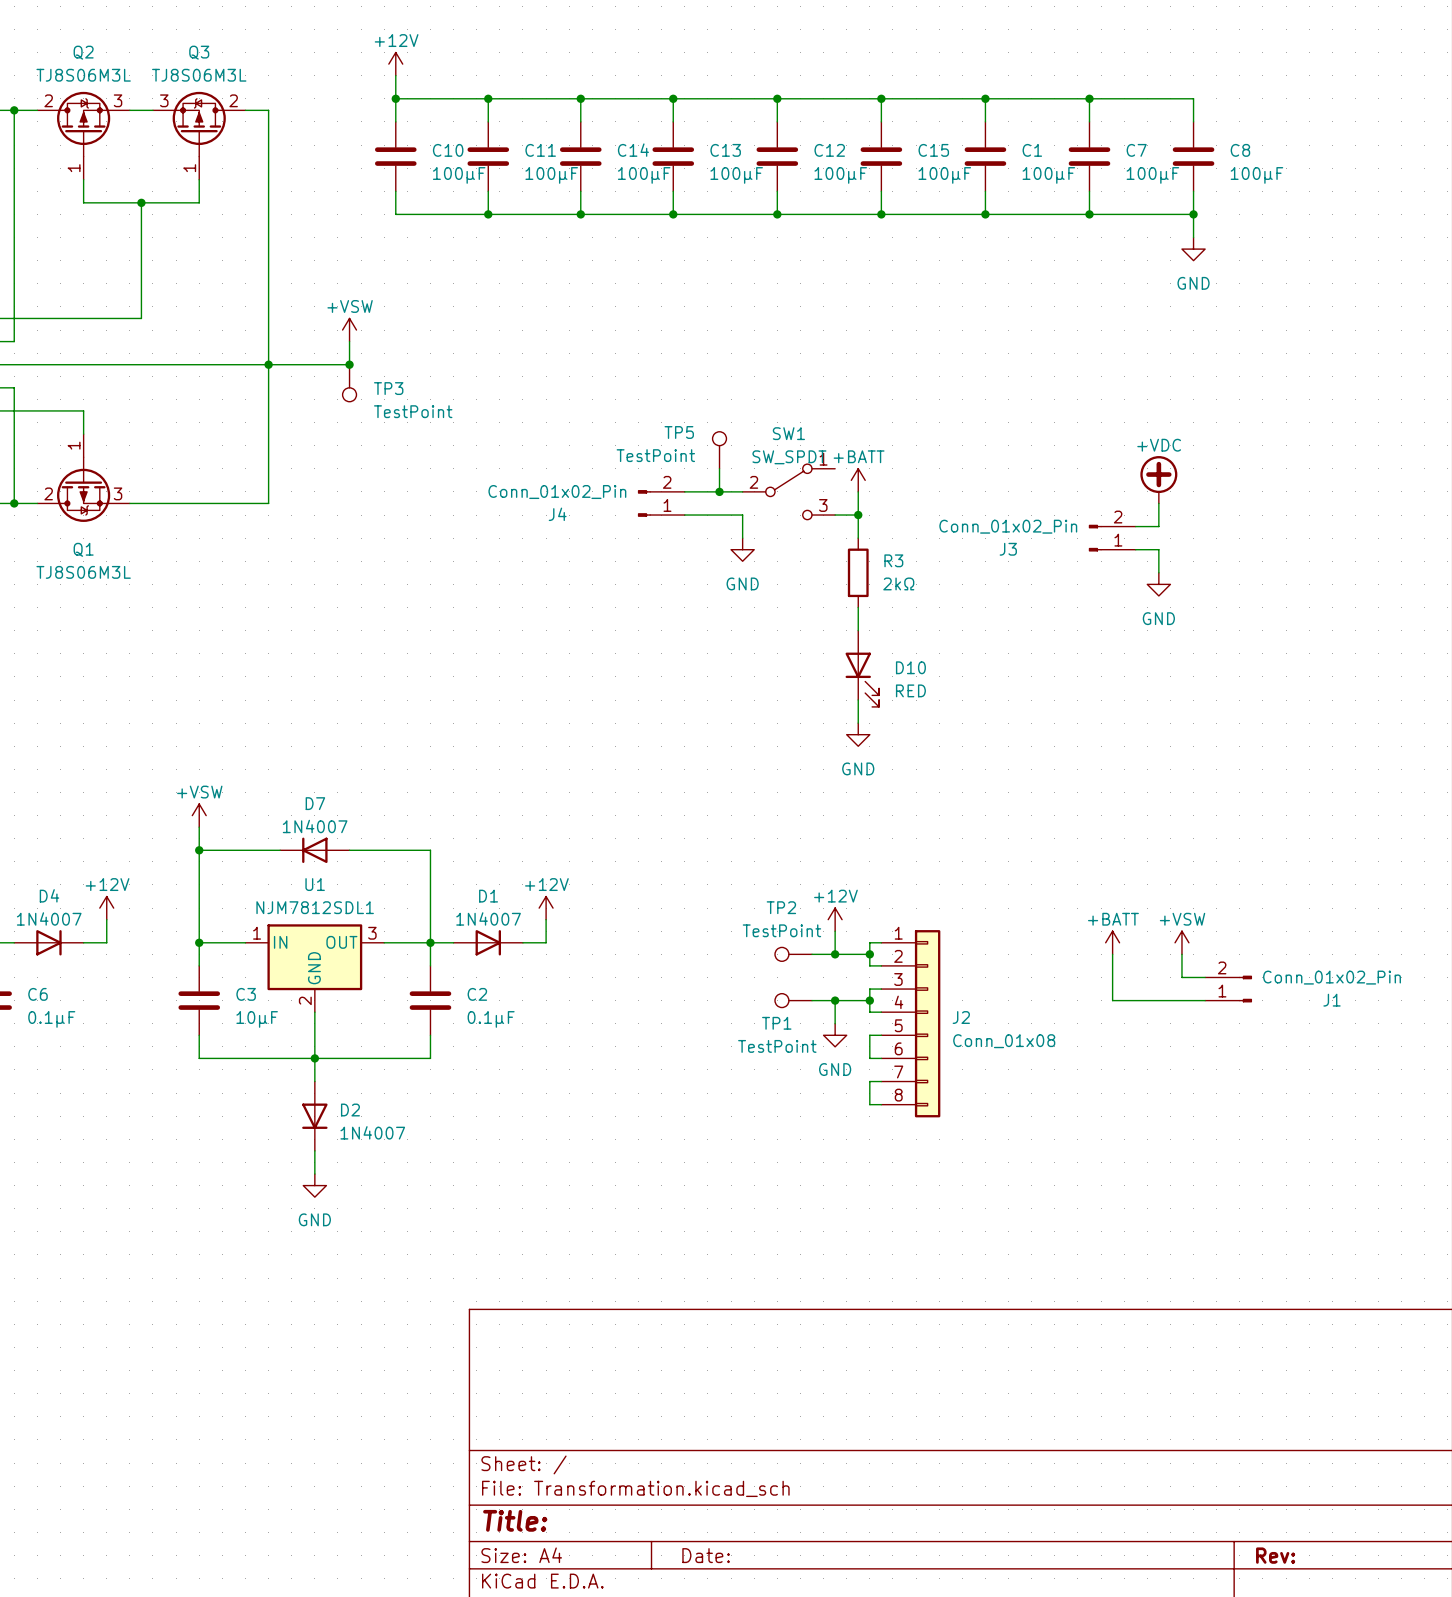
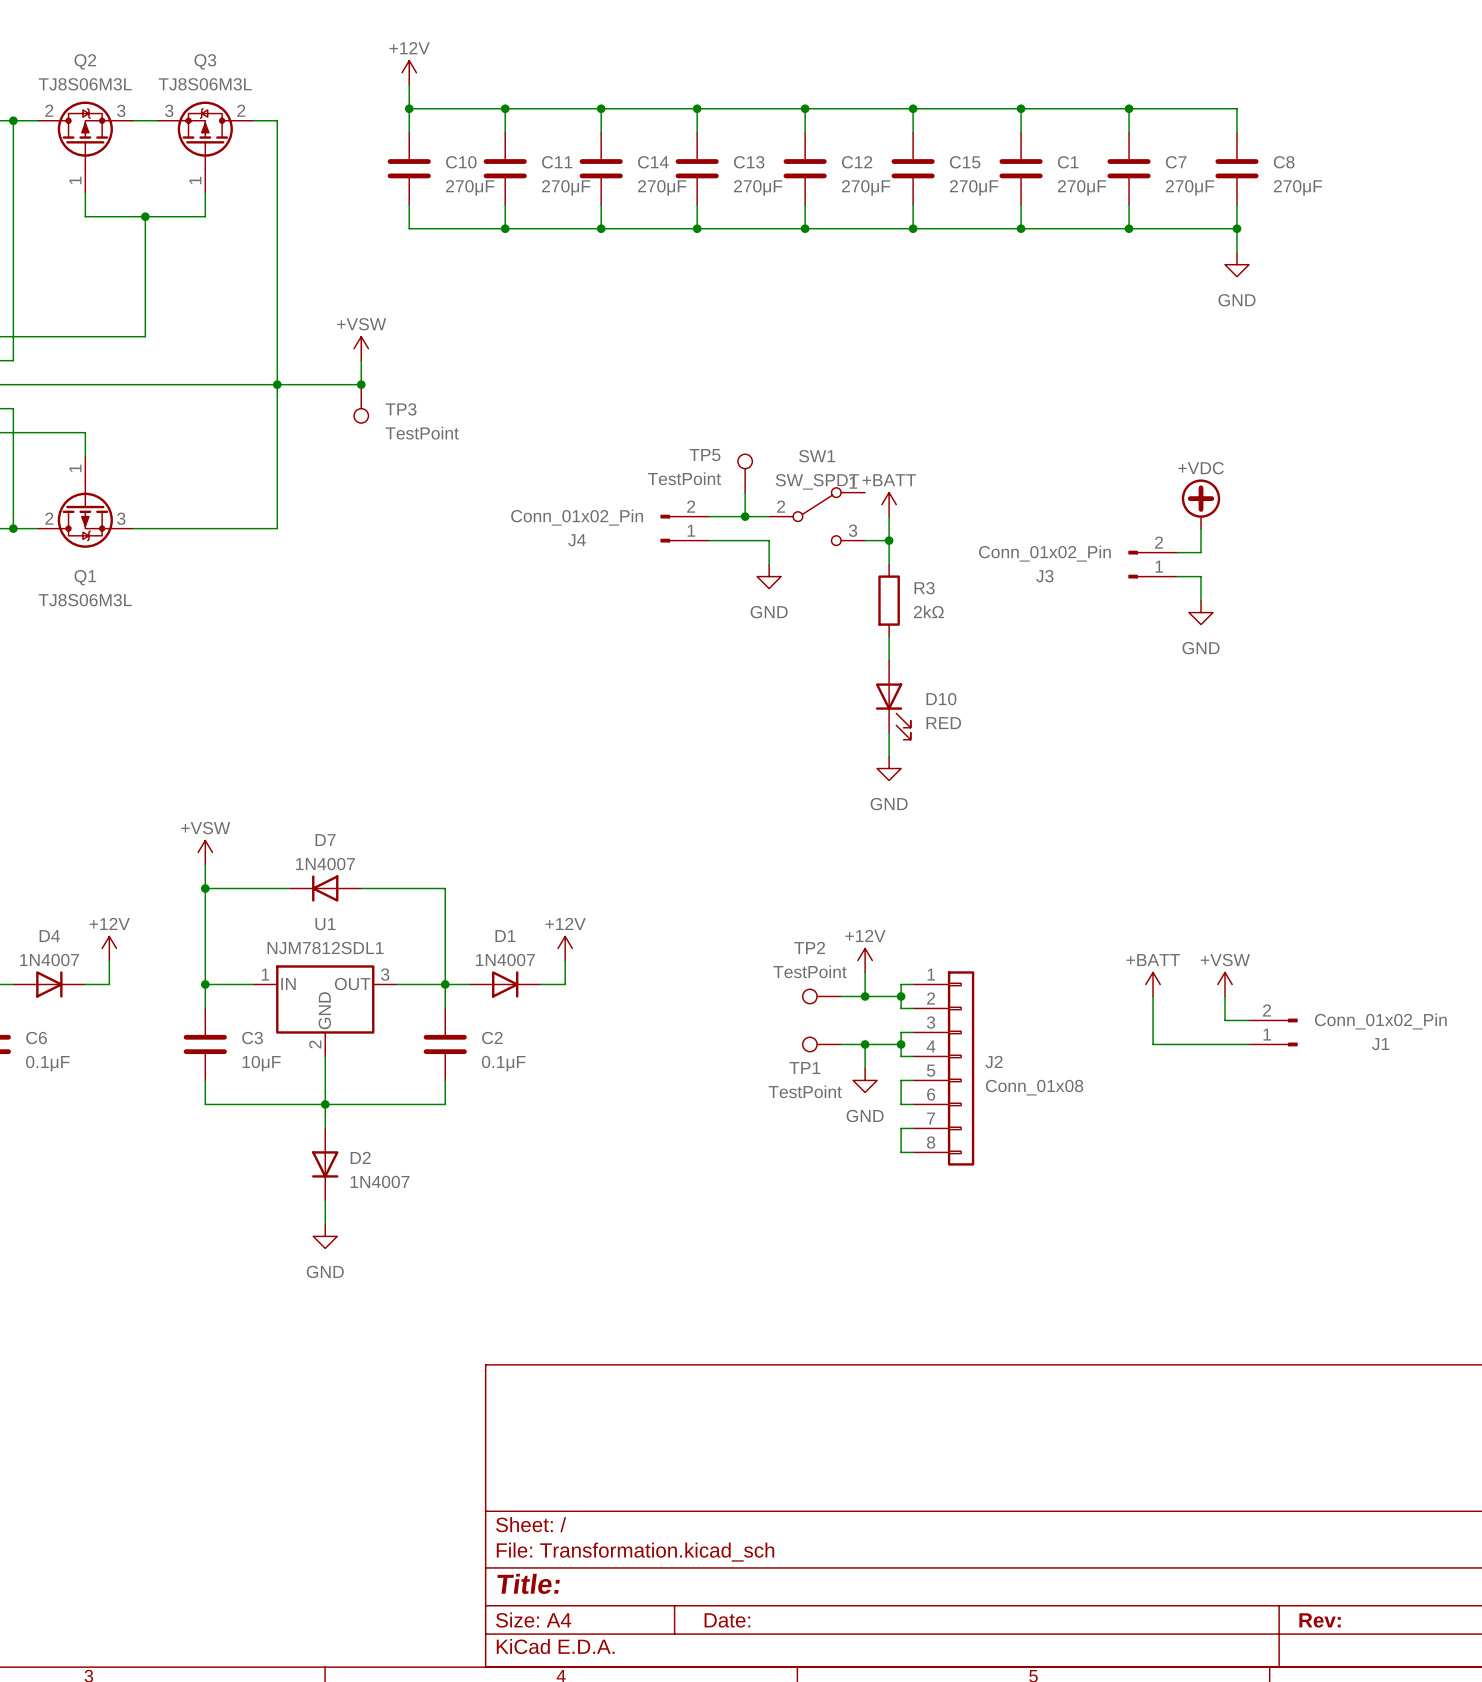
C10 value: 100μF (459, 175) -> 270μF (470, 187)
C11 value: 100μF (551, 175) -> 270μF (566, 187)
C14 value: 100μF (644, 175) -> 270μF (662, 187)
C13 value: 100μF (736, 175) -> 270μF (758, 187)
C12 value: 100μF (840, 175) -> 270μF (866, 187)
C15 value: 100μF (944, 175) -> 270μF (974, 187)
C1 value: 100μF (1048, 175) -> 270μF (1082, 187)
C7 value: 100μF (1152, 175) -> 270μF (1190, 187)
C8 value: 100μF (1256, 175) -> 270μF (1297, 187)

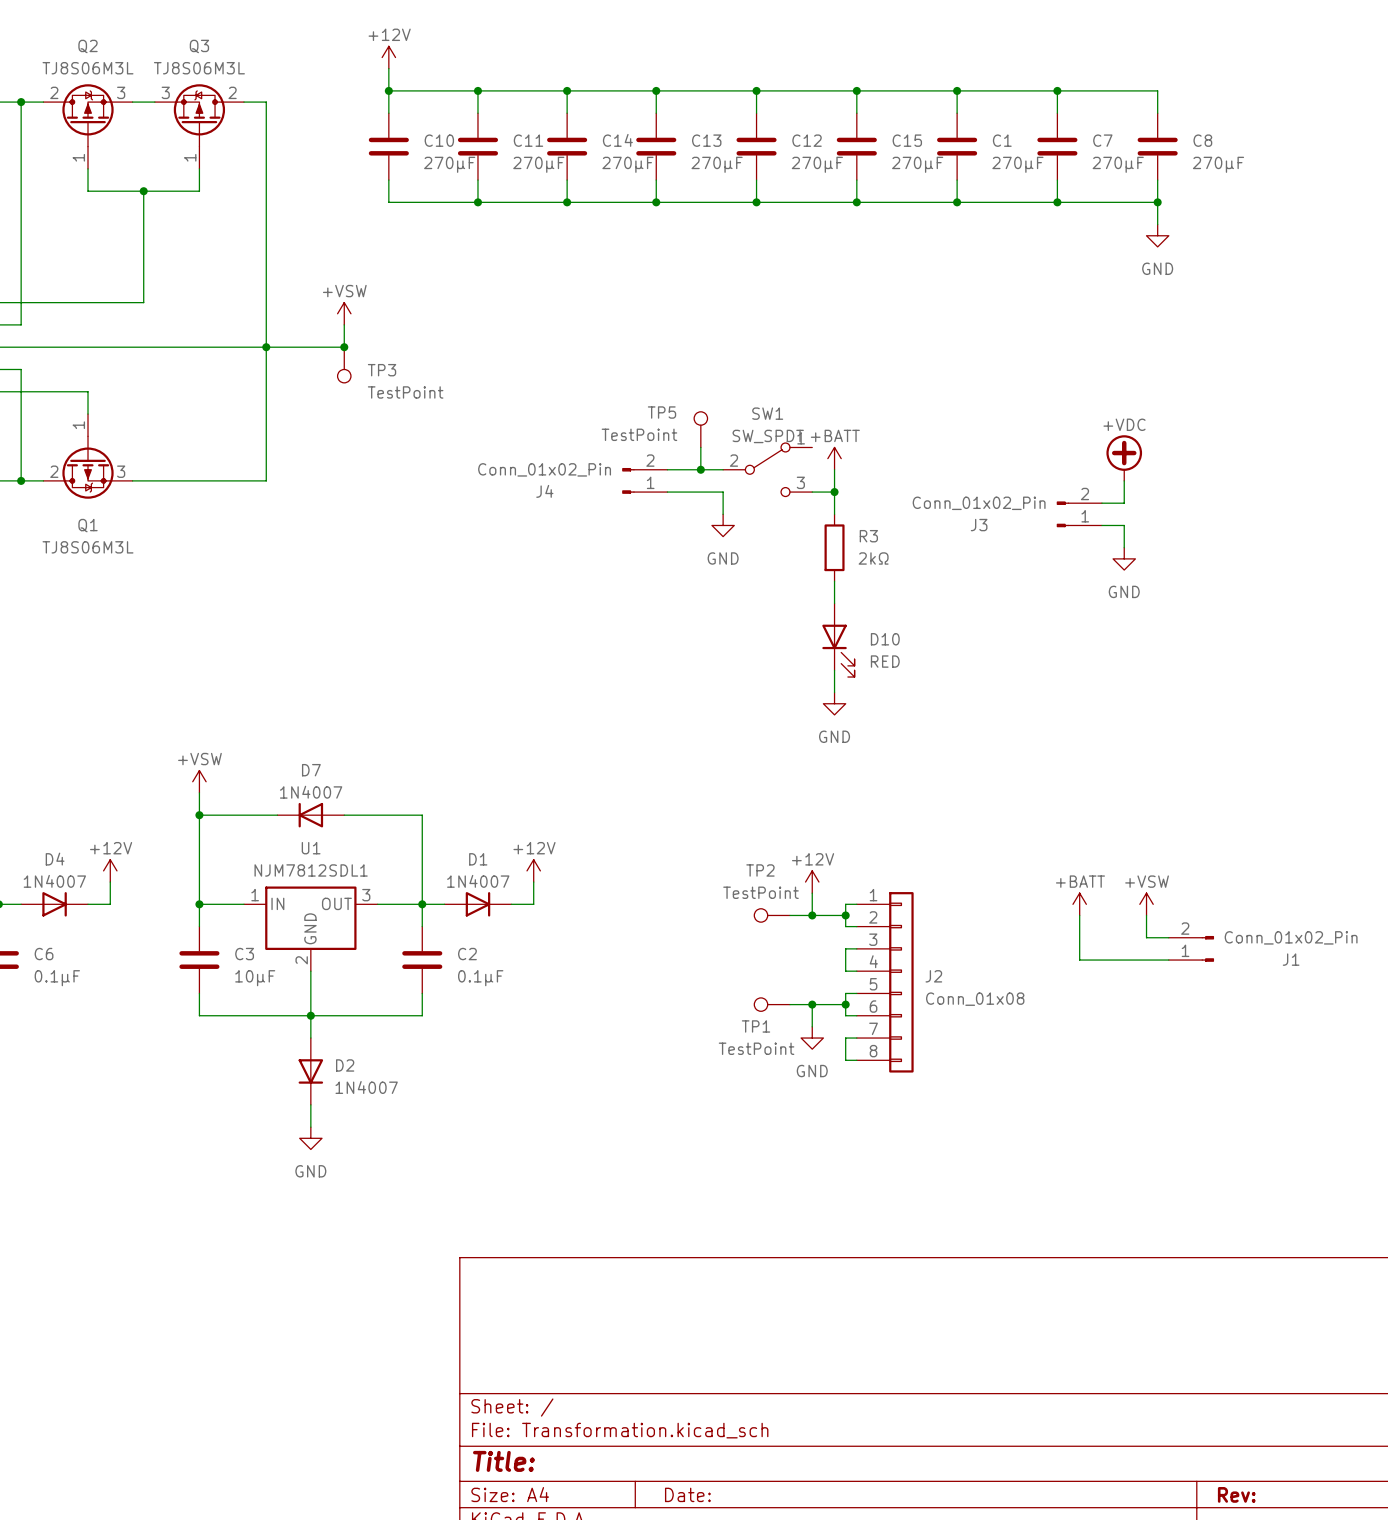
TP1 position: (821, 1044) -> (772, 1004)
wire: (841, 1044) (901, 1044) -> (789, 1004) (845, 1004)
wire: (865, 1044) (865, 1068) -> (812, 1004) (812, 1026)
junction: (865, 1044) -> none
junction: (901, 1044) -> none
power symbol position: GND (865, 1080) -> GND (812, 1038)
junction: none -> (812, 1004)
junction: none -> (845, 1004)

